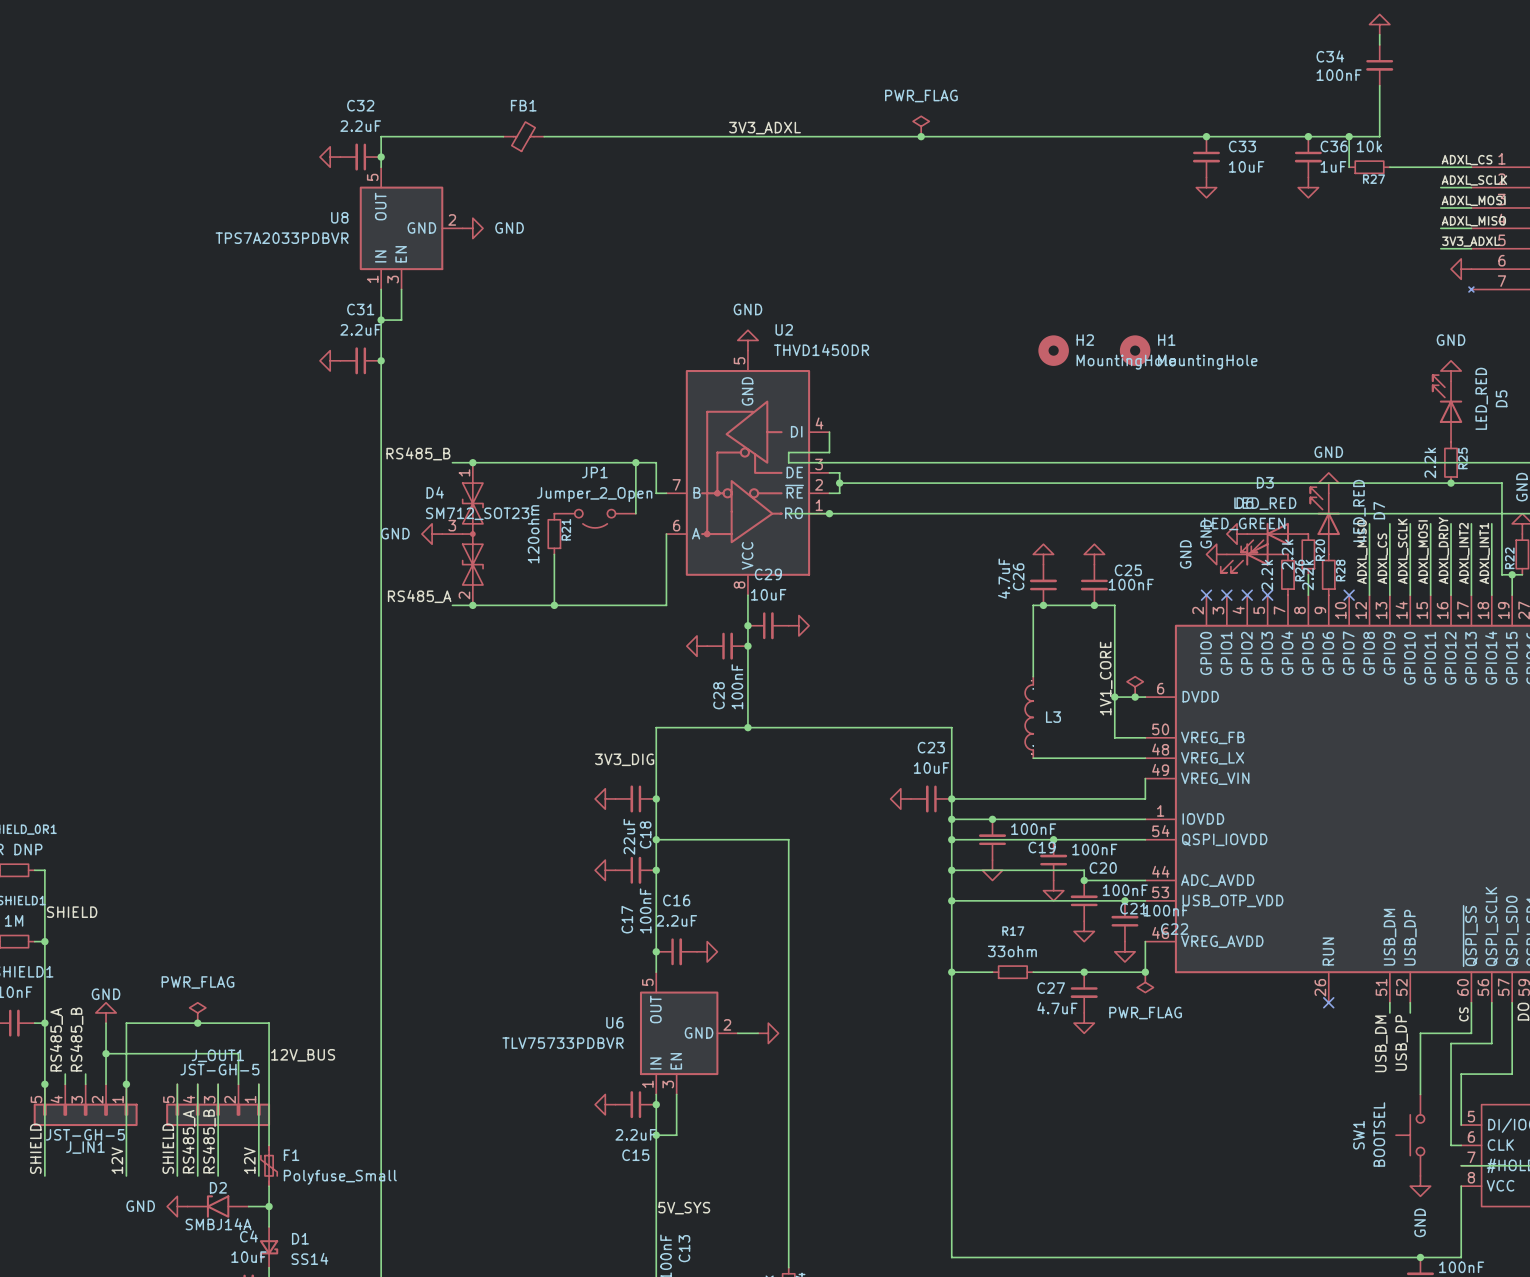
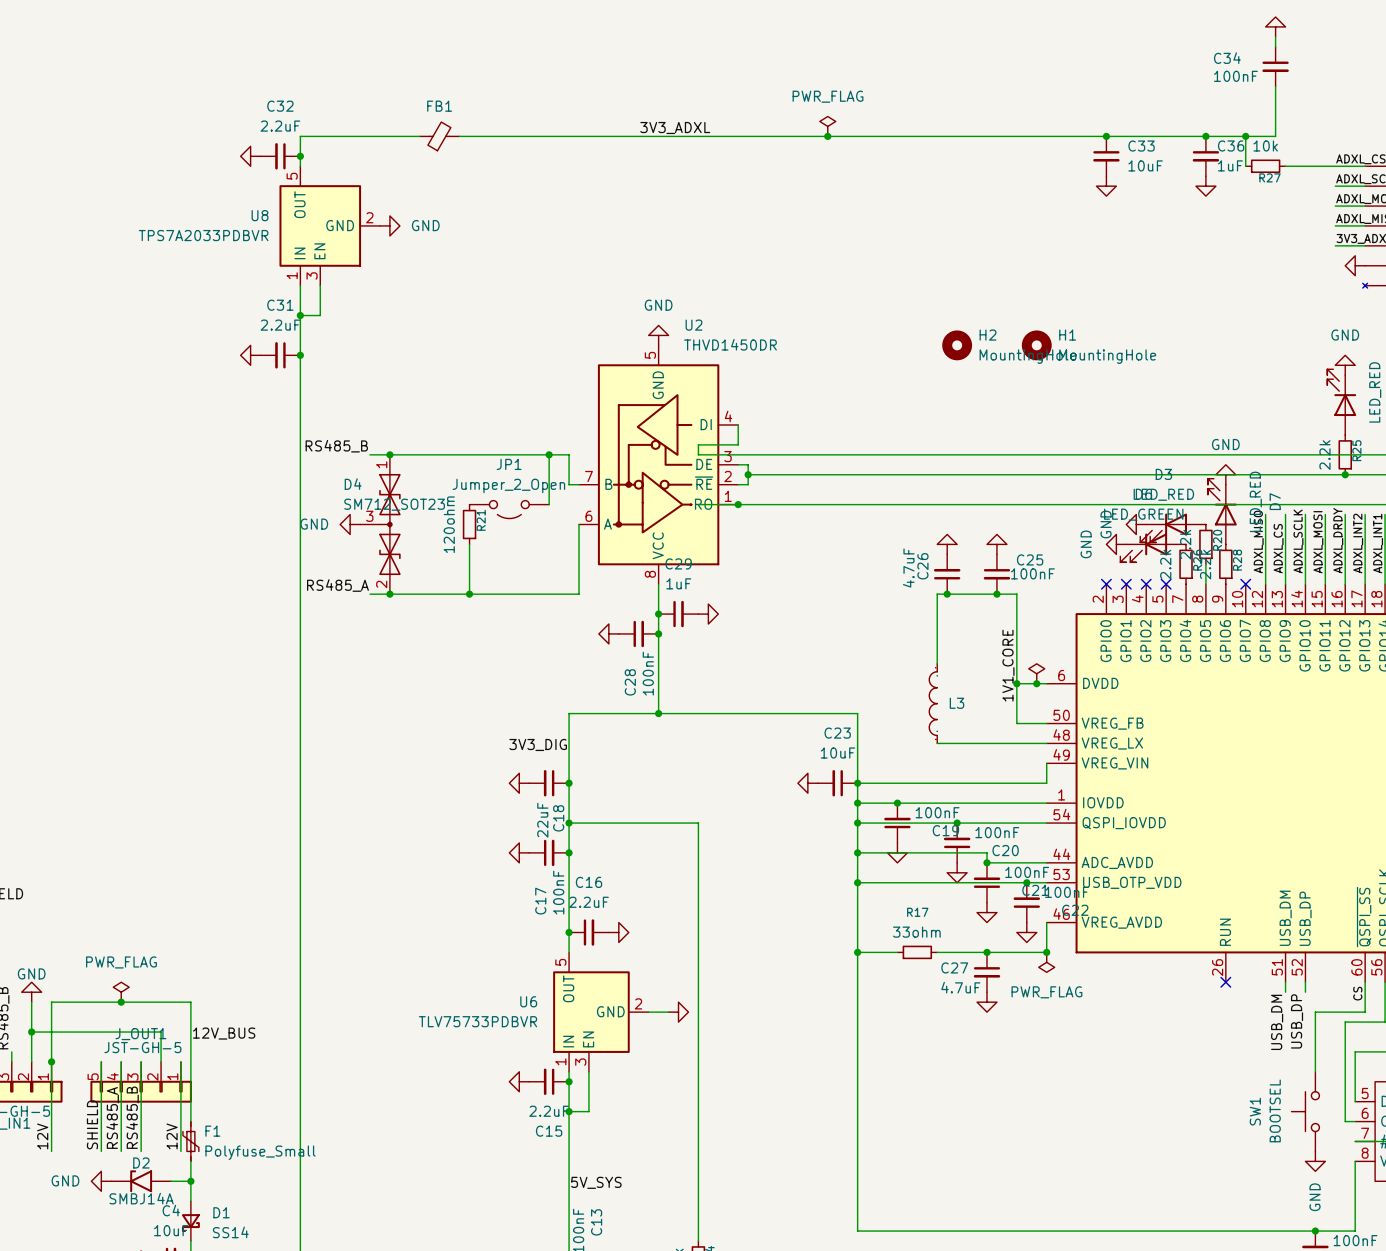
C29 value: 10uF (768, 594) -> 1uF (678, 583)

